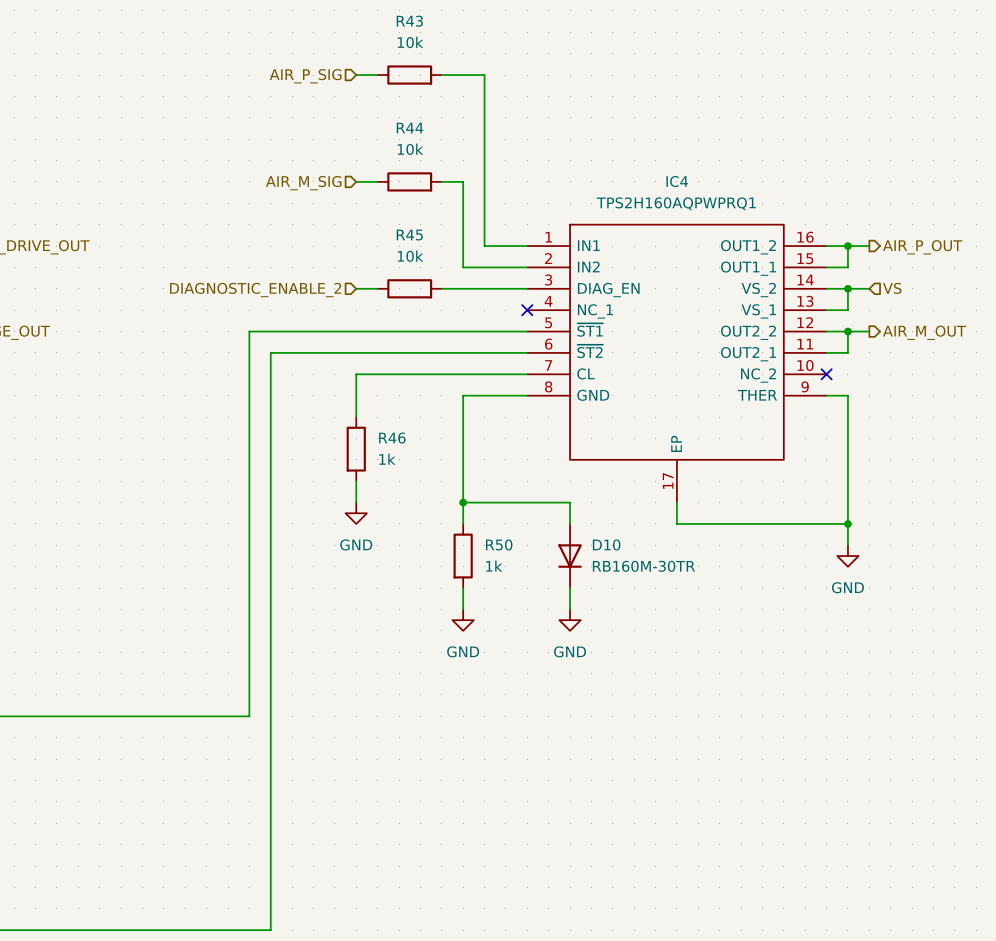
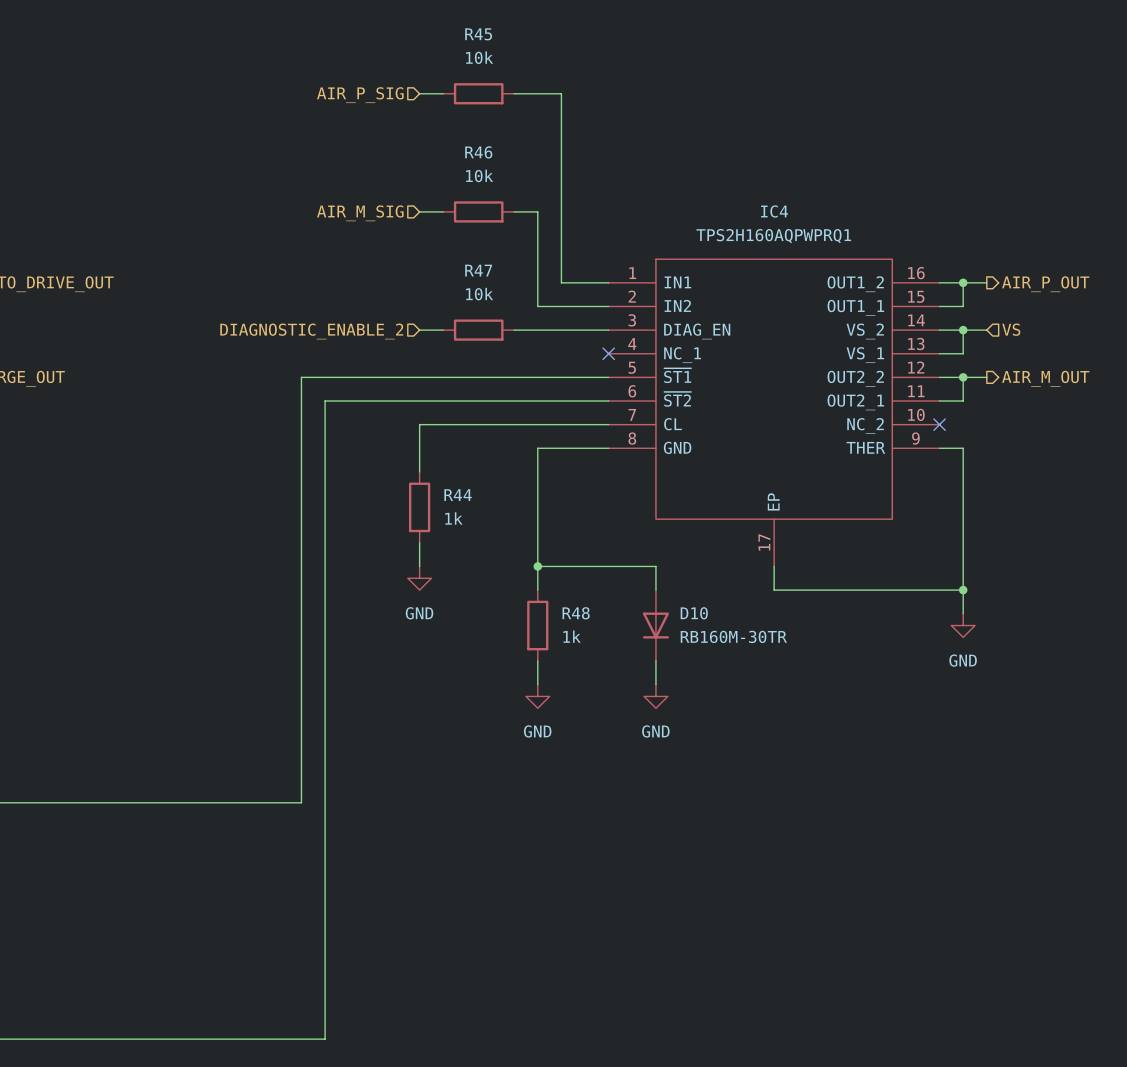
R43 name: R43 (409, 21) -> R45 (478, 34)
R44 name: R44 (410, 128) -> R46 (478, 152)
R45 name: R45 (409, 235) -> R47 (478, 270)
R46 name: R46 (392, 438) -> R44 (458, 495)
R50 name: R50 (499, 544) -> R48 (576, 613)

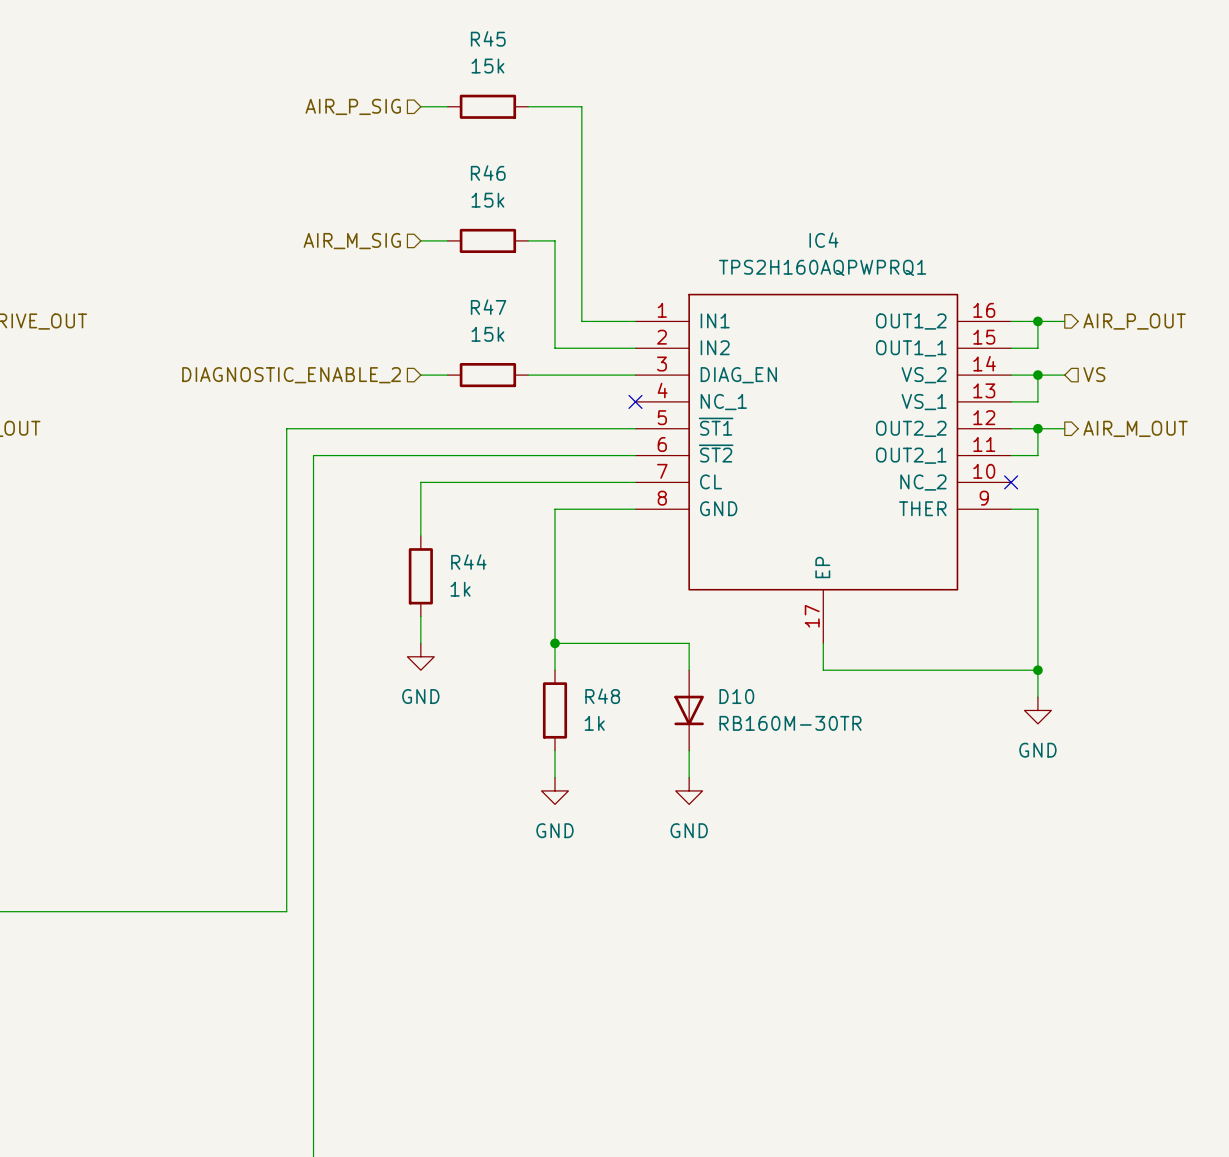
R45 value: 10k (479, 57) -> 15k (487, 66)
R46 value: 10k (479, 175) -> 15k (487, 200)
R47 value: 10k (479, 294) -> 15k (487, 334)

